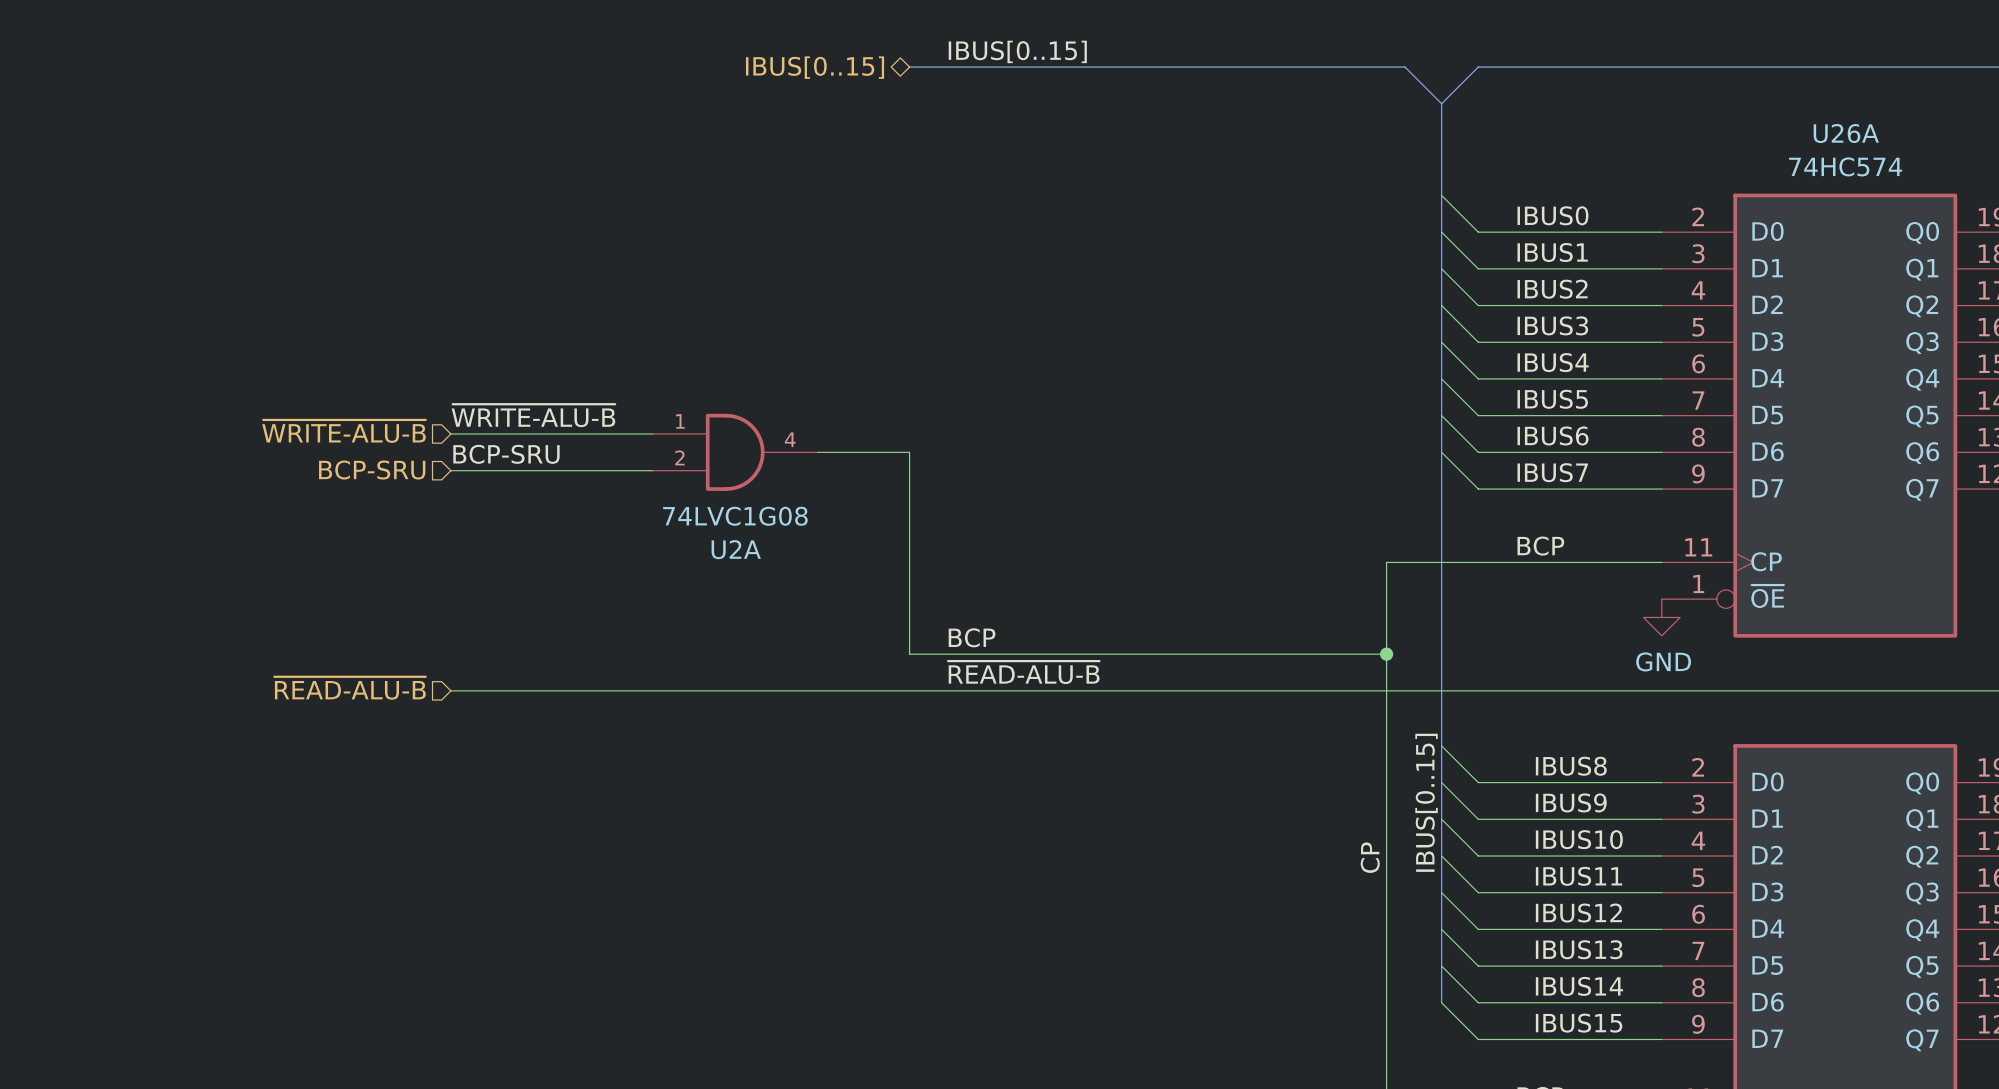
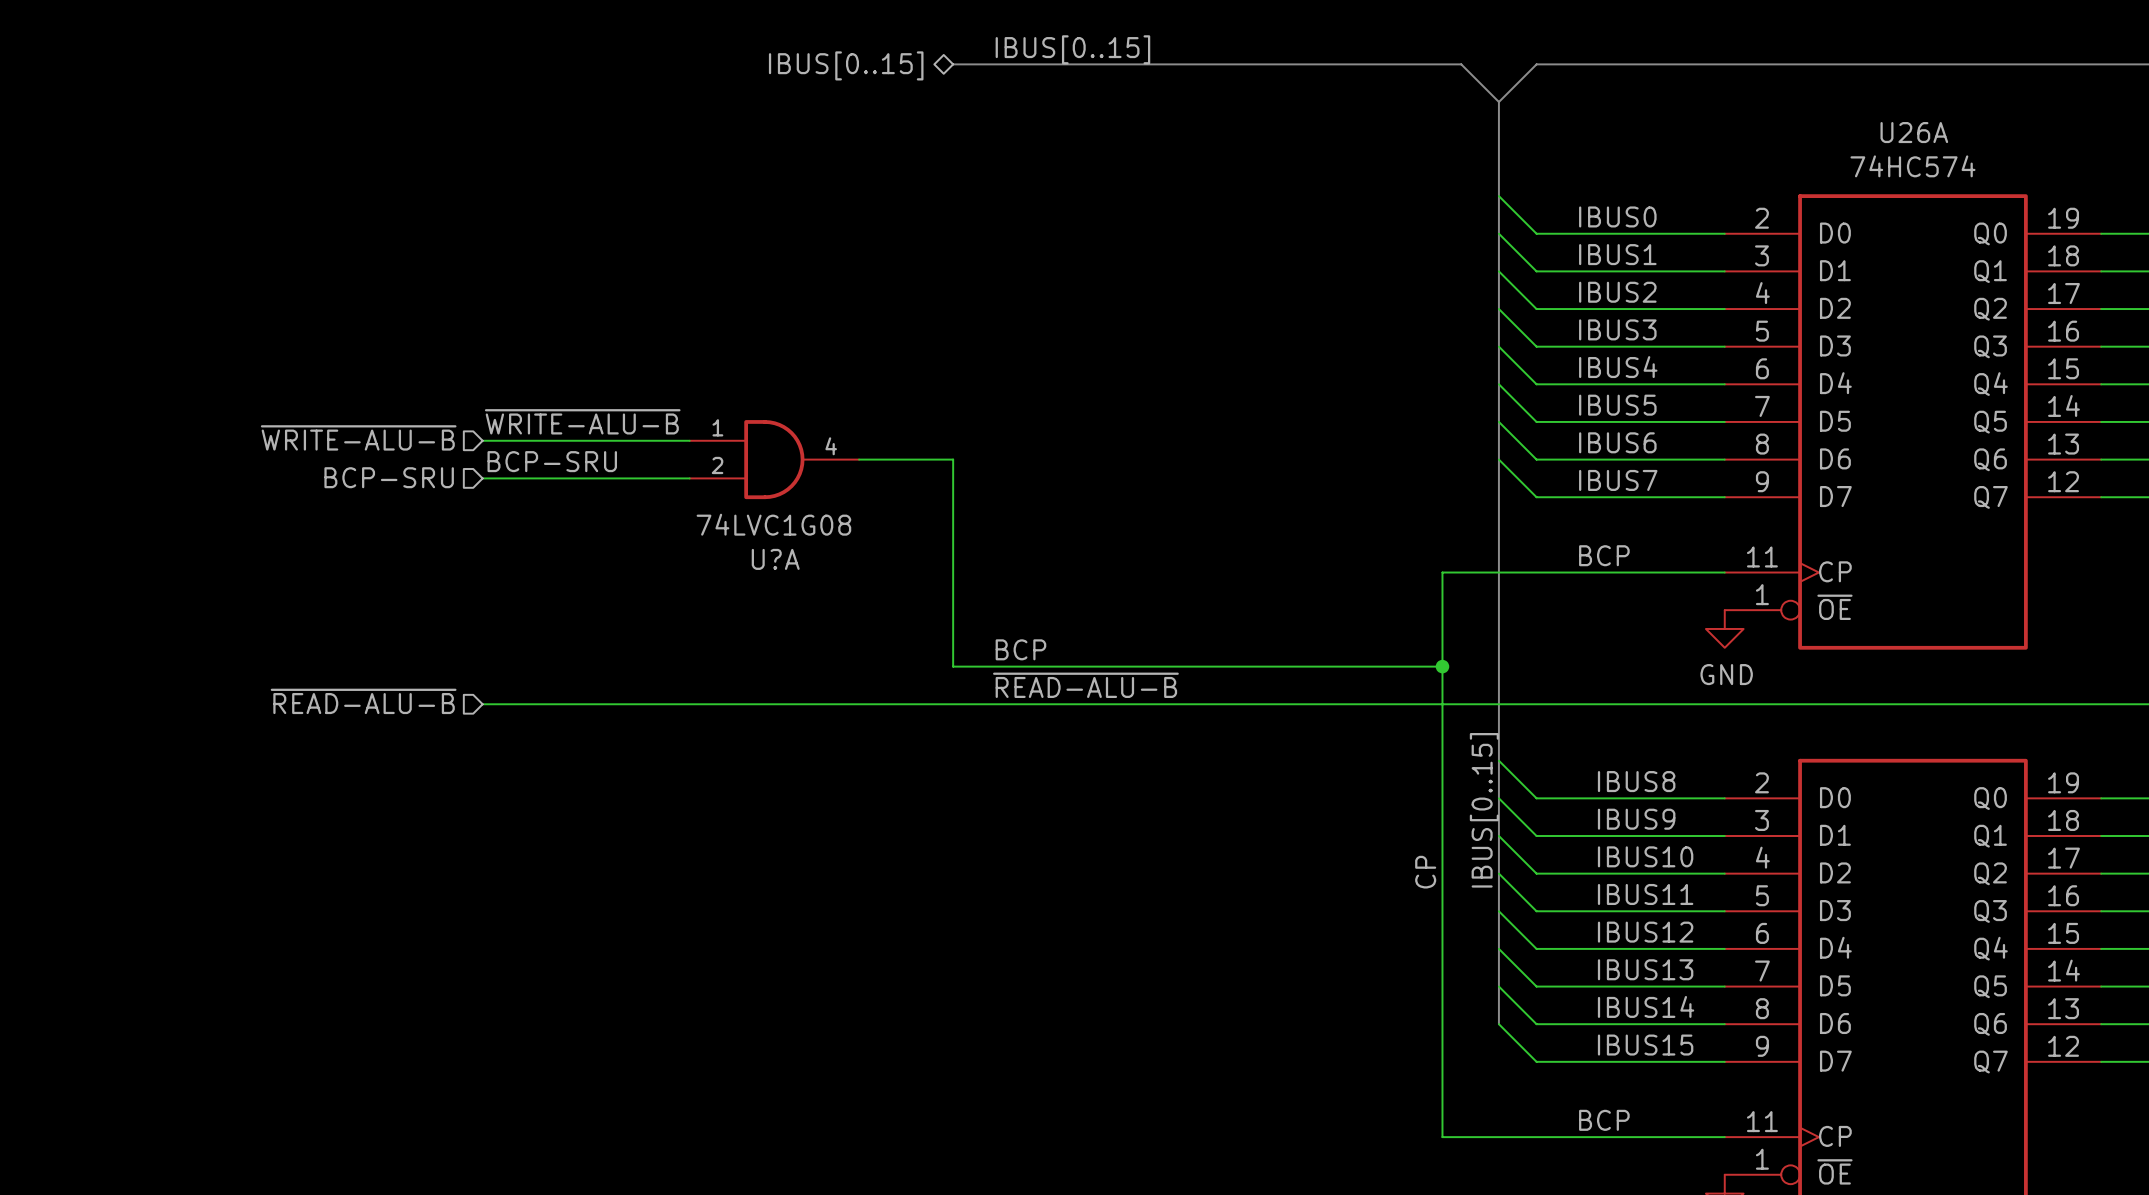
U2A name: U2A (736, 549) -> U?A (775, 559)

